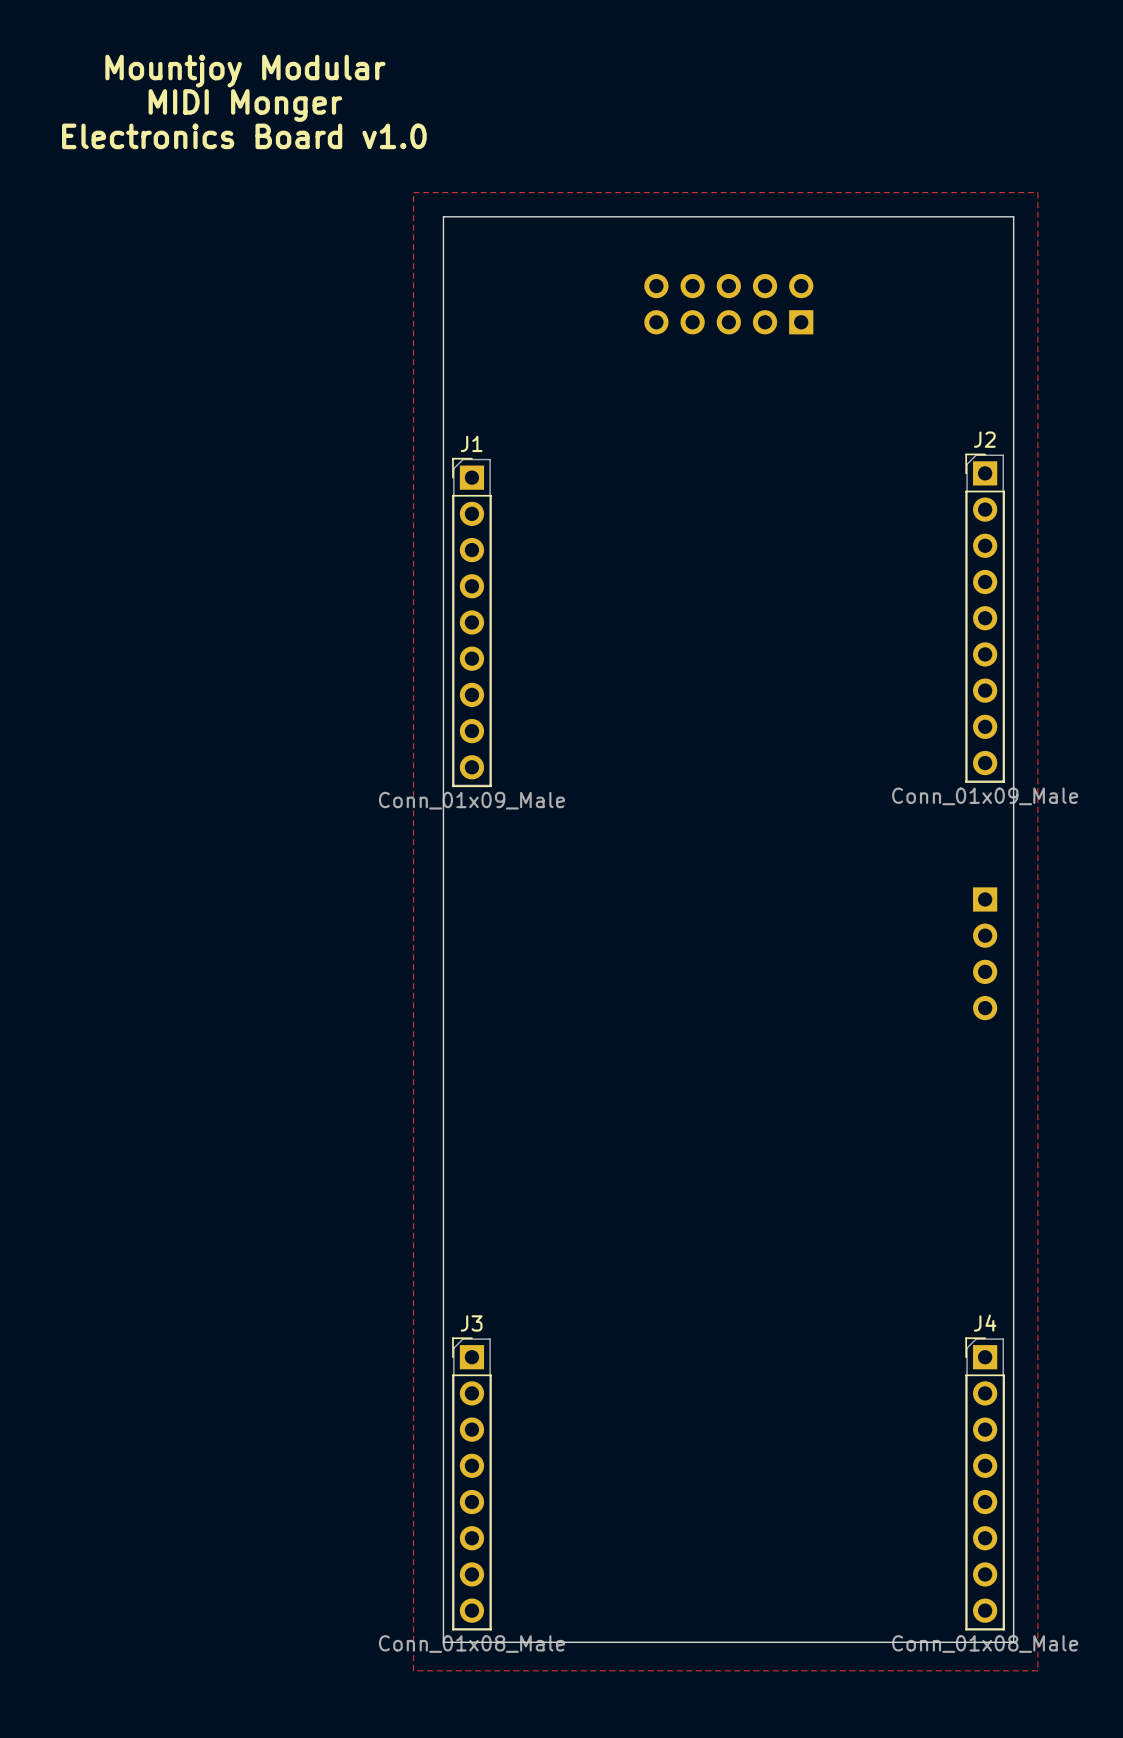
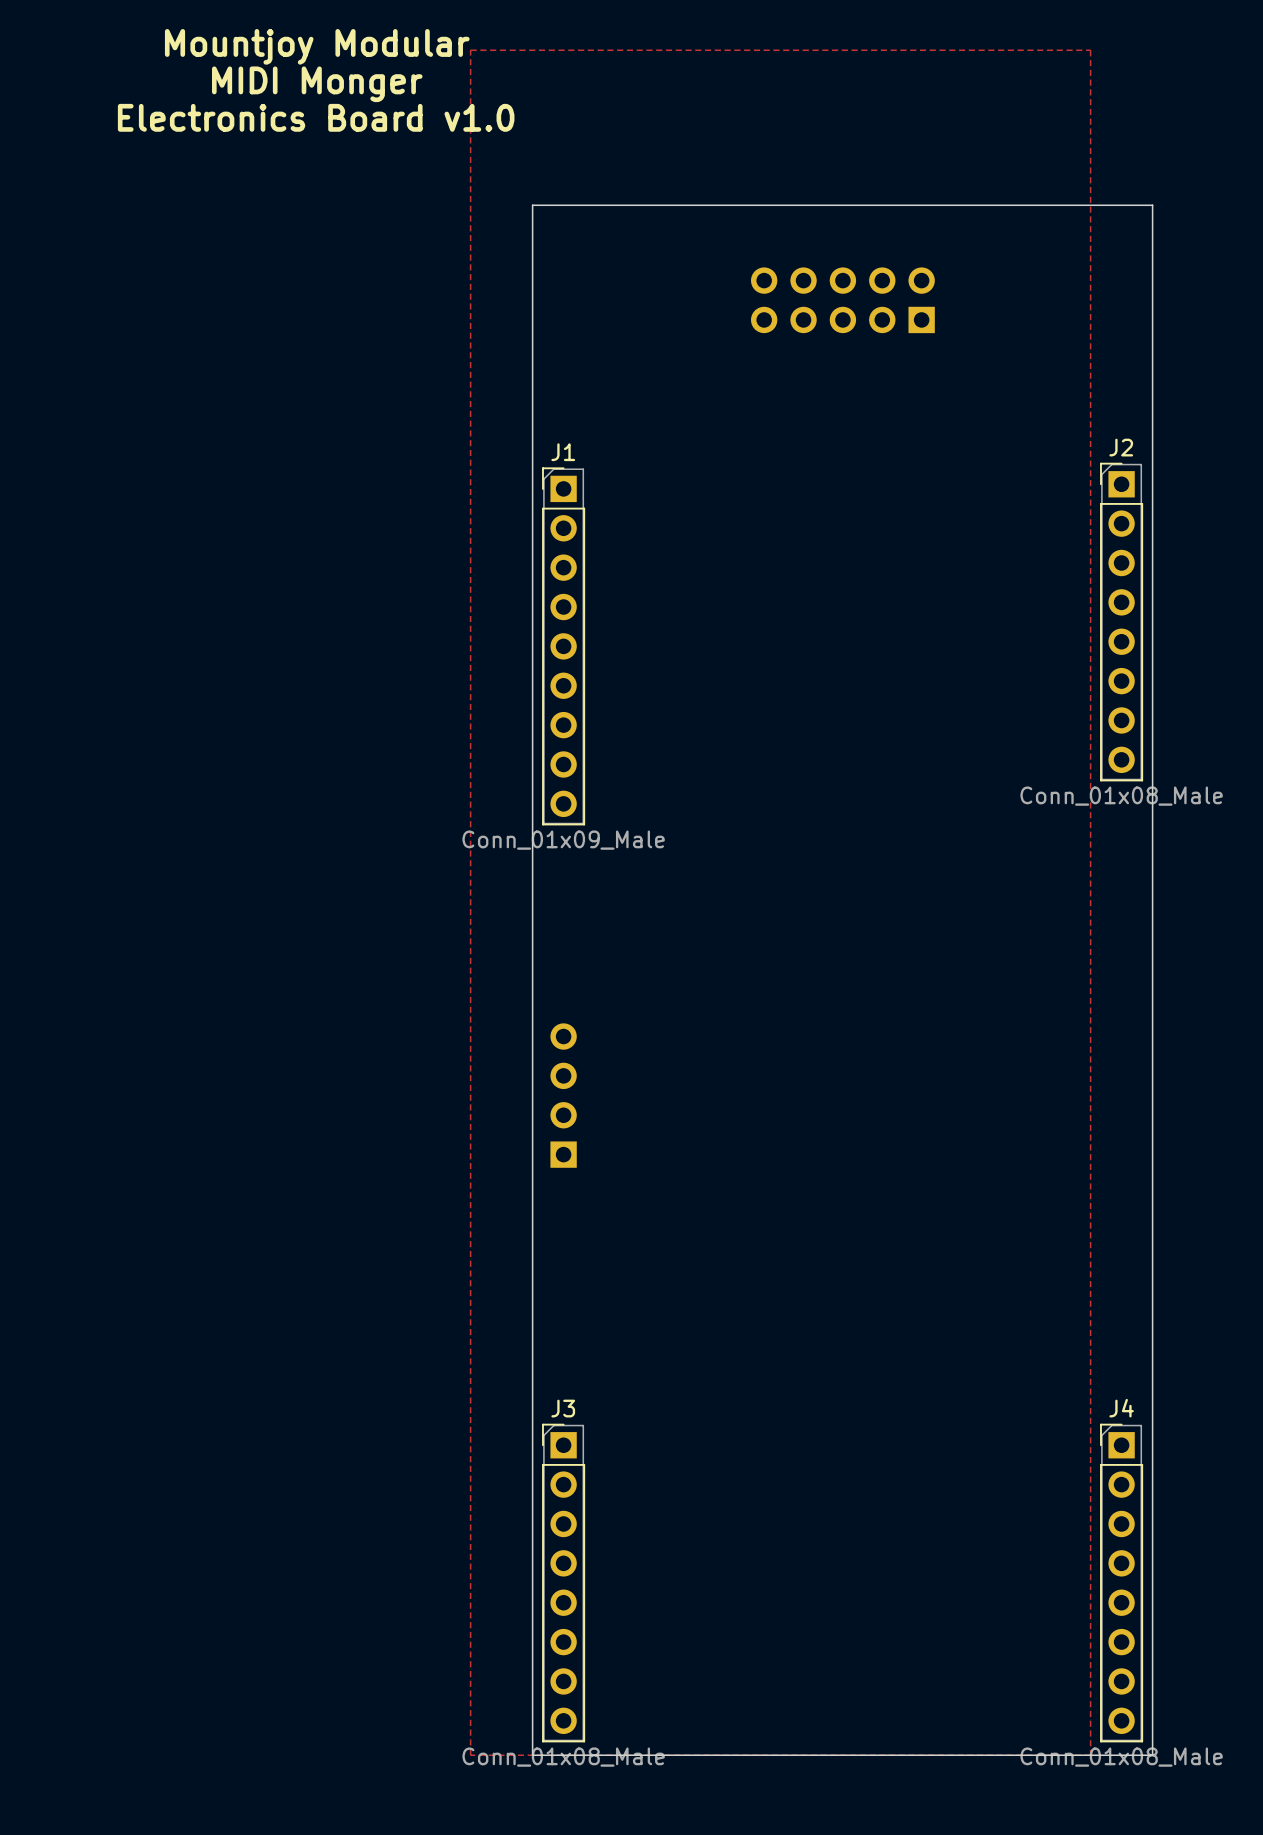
zone outline: (413, 192) (1037, 192) (1037, 1670) (413, 1670) (413, 192) -> (470, 50) (470, 1755) (1090, 1755) (1090, 50) (470, 50)
J2 footprint: [965, 453, 1005, 783] -> [1100, 462, 1144, 782]
J2 value: Conn_01x09_Male (985, 796) -> Conn_01x08_Male (1121, 796)
part: (985, 953) -> none
part: none -> (563, 1095)

